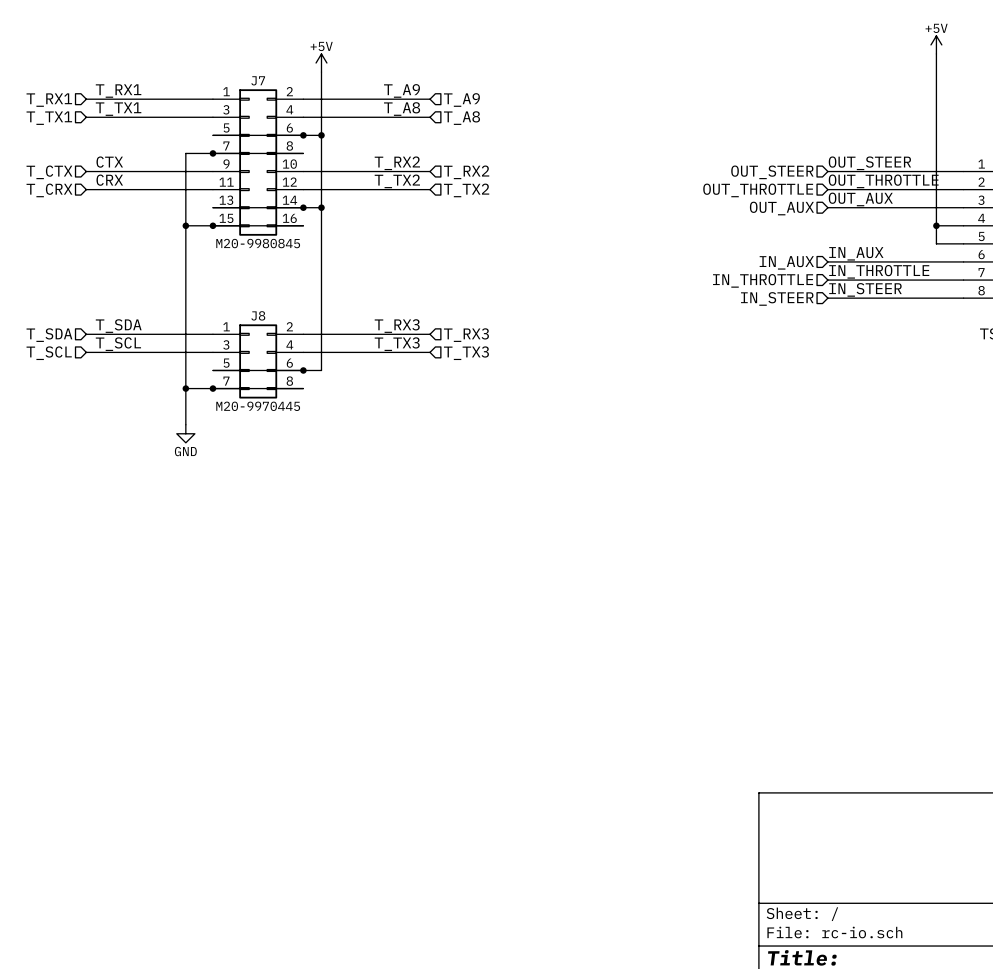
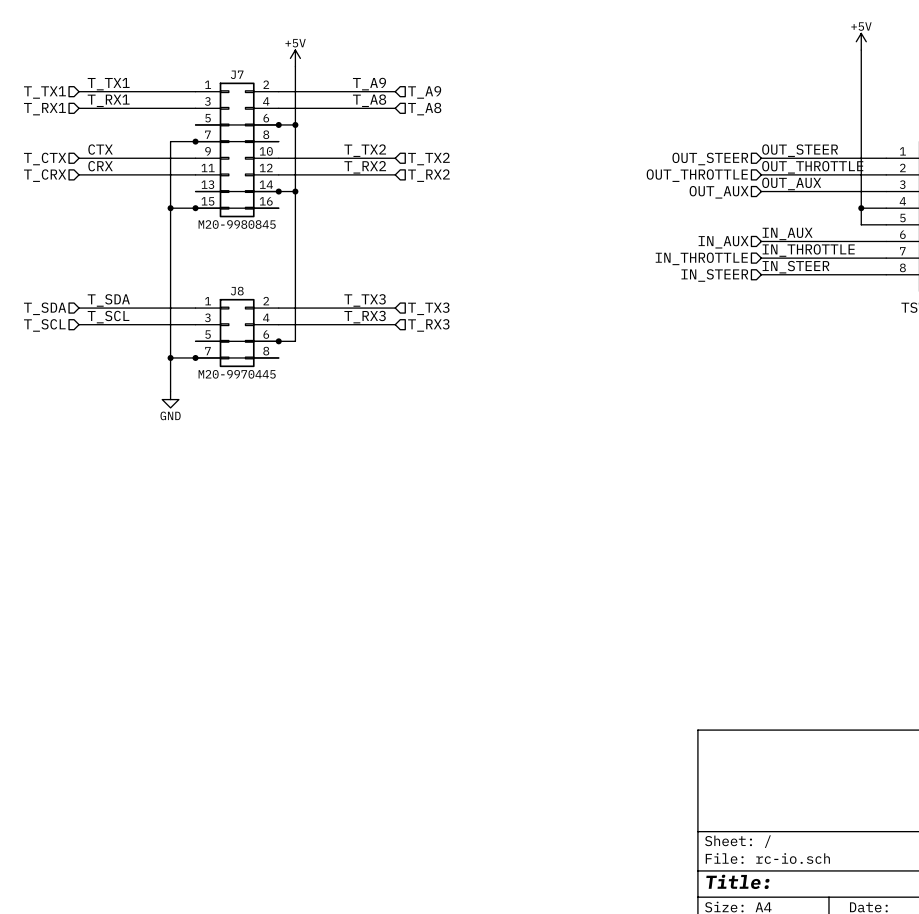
label: T_RX1 (118, 91) -> T_TX1 (108, 84)
hierarchical label: T_RX1 (49, 100) -> T_TX1 (44, 92)
label: T_TX1 (118, 109) -> T_RX1 (108, 100)
hierarchical label: T_TX1 (49, 118) -> T_RX1 (44, 109)
label: T_RX2 (397, 163) -> T_TX2 (365, 150)
hierarchical label: T_RX2 (466, 172) -> T_TX2 (428, 159)
label: T_TX2 (397, 181) -> T_RX2 (365, 167)
hierarchical label: T_TX2 (466, 190) -> T_RX2 (428, 175)
label: T_RX3 (397, 326) -> T_TX3 (365, 300)
hierarchical label: T_RX3 (466, 335) -> T_TX3 (428, 308)
label: T_TX3 (397, 344) -> T_RX3 (365, 317)
hierarchical label: T_TX3 (466, 353) -> T_RX3 (428, 325)

